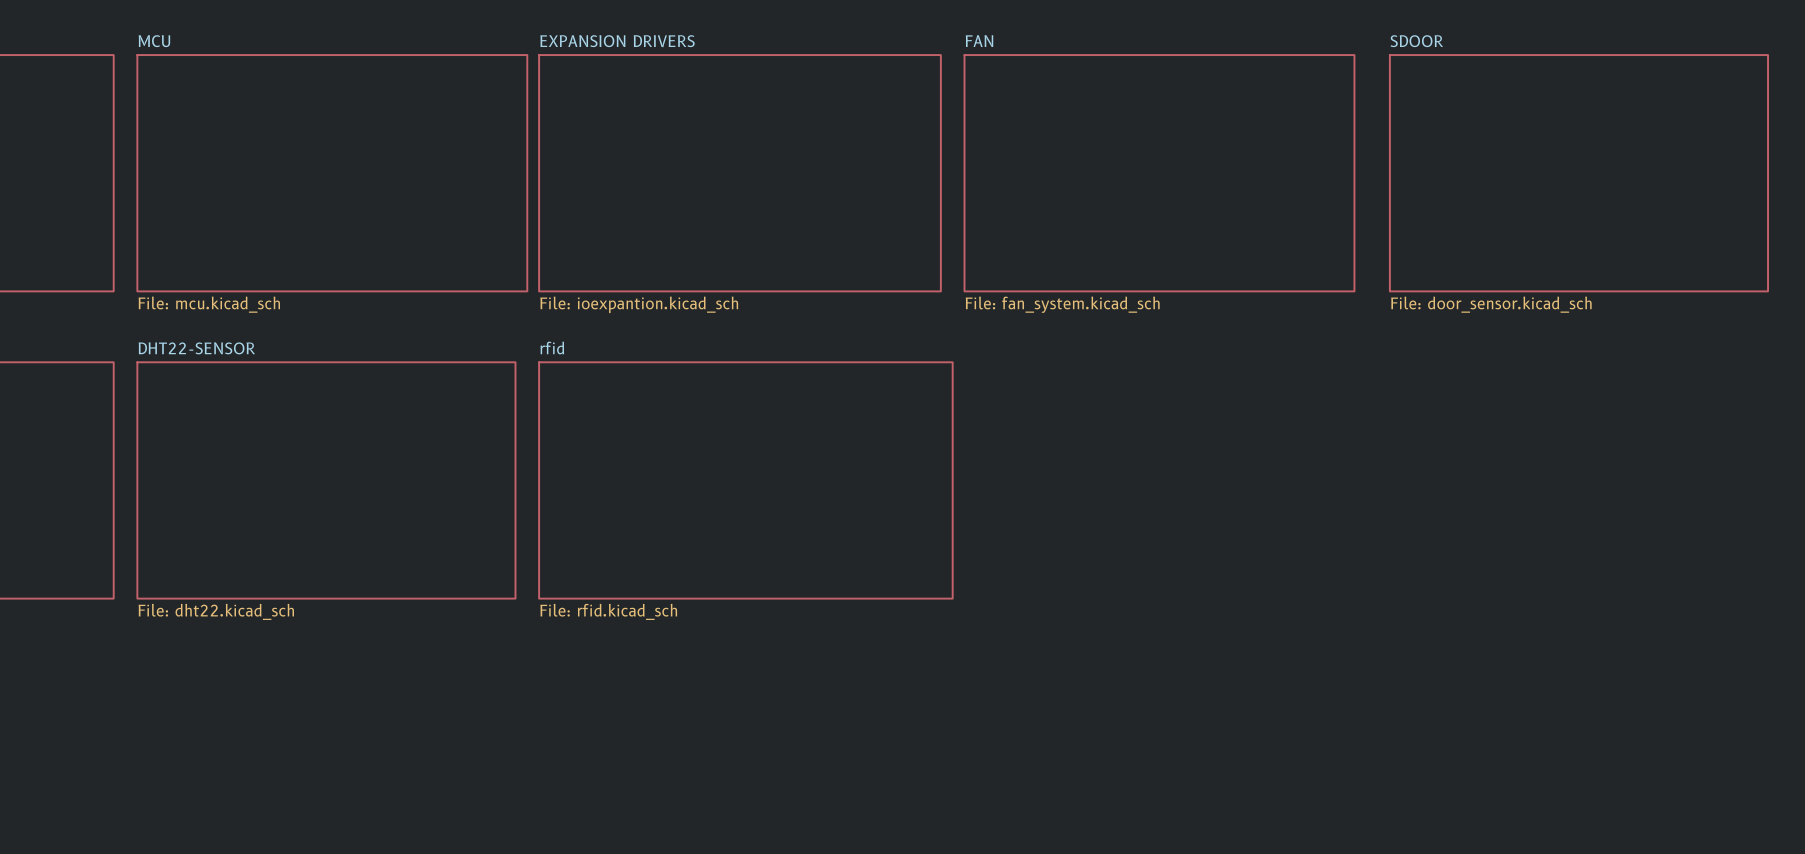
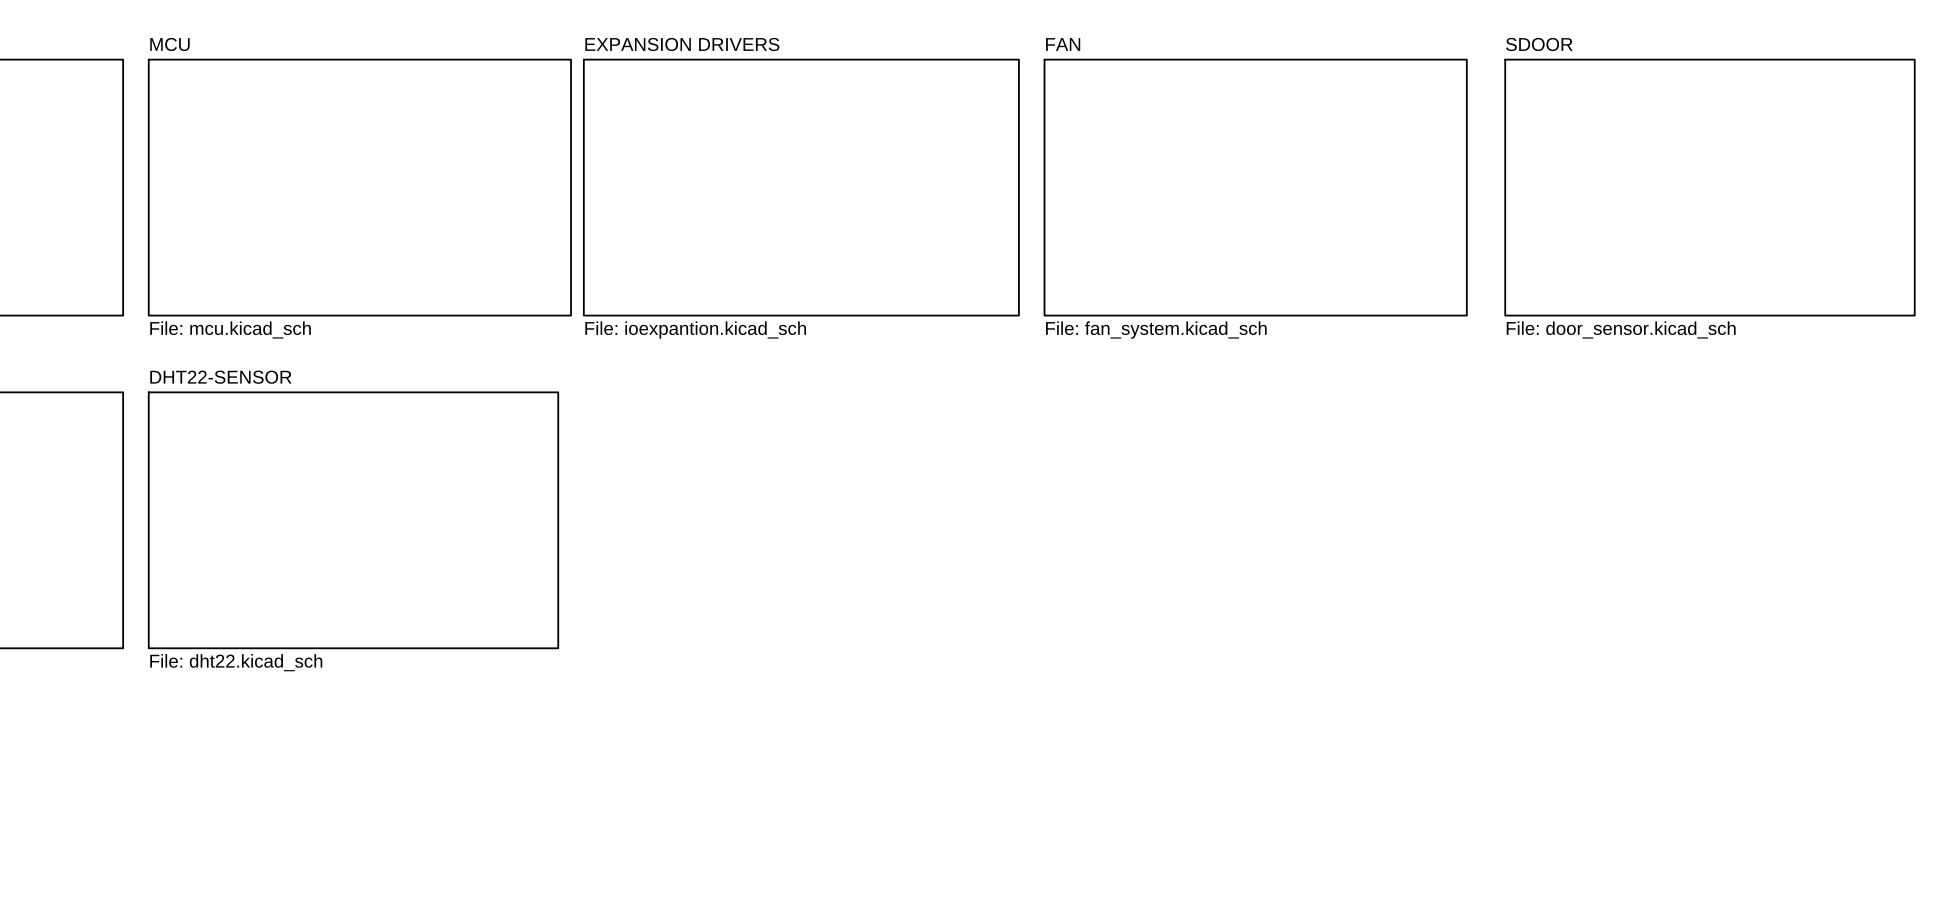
sheet rfid: File: rfid.kicad_sch (745, 480) -> none

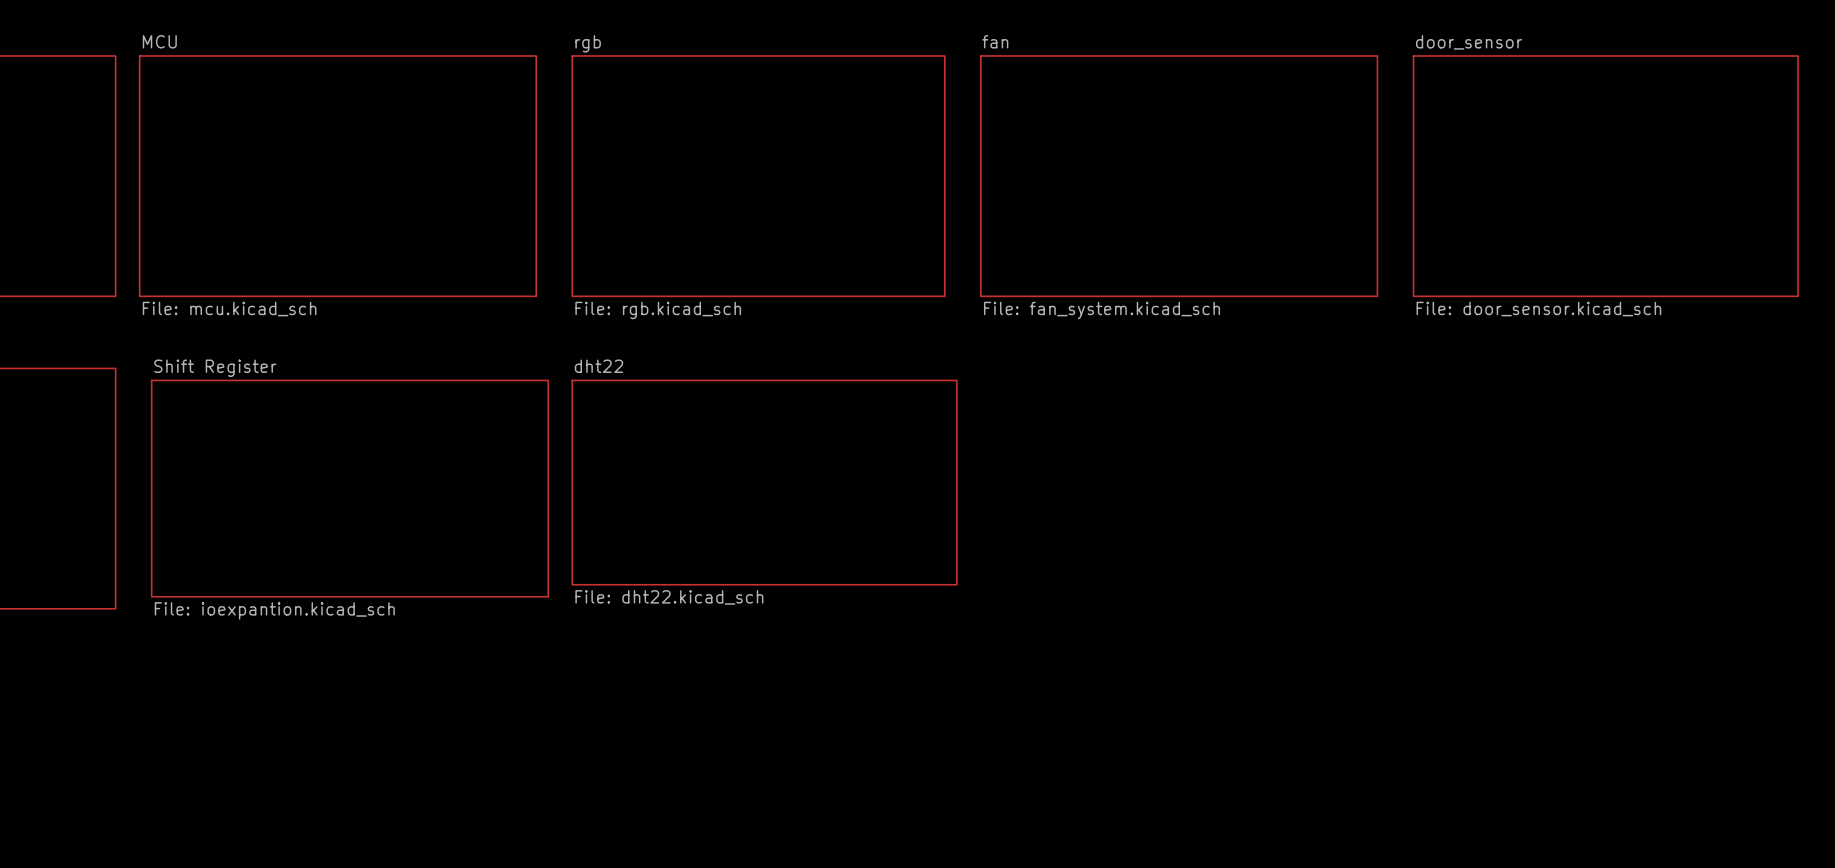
sheet FAN name: FAN (1063, 44) -> fan (995, 41)
sheet SDOOR name: SDOOR (1539, 44) -> door_sensor (1469, 42)
sheet EXPANSION DRIVERS: File: ioexpantion.kicad_sch (801, 187) -> none
sheet rgb: none -> File: rgb.kicad_sch (758, 176)
sheet dht22: none -> File: dht22.kicad_sch (764, 482)
sheet DHT22-SENSOR: File: dht22.kicad_sch (353, 520) -> none
sheet Shift Register: none -> File: ioexpantion.kicad_sch (349, 488)

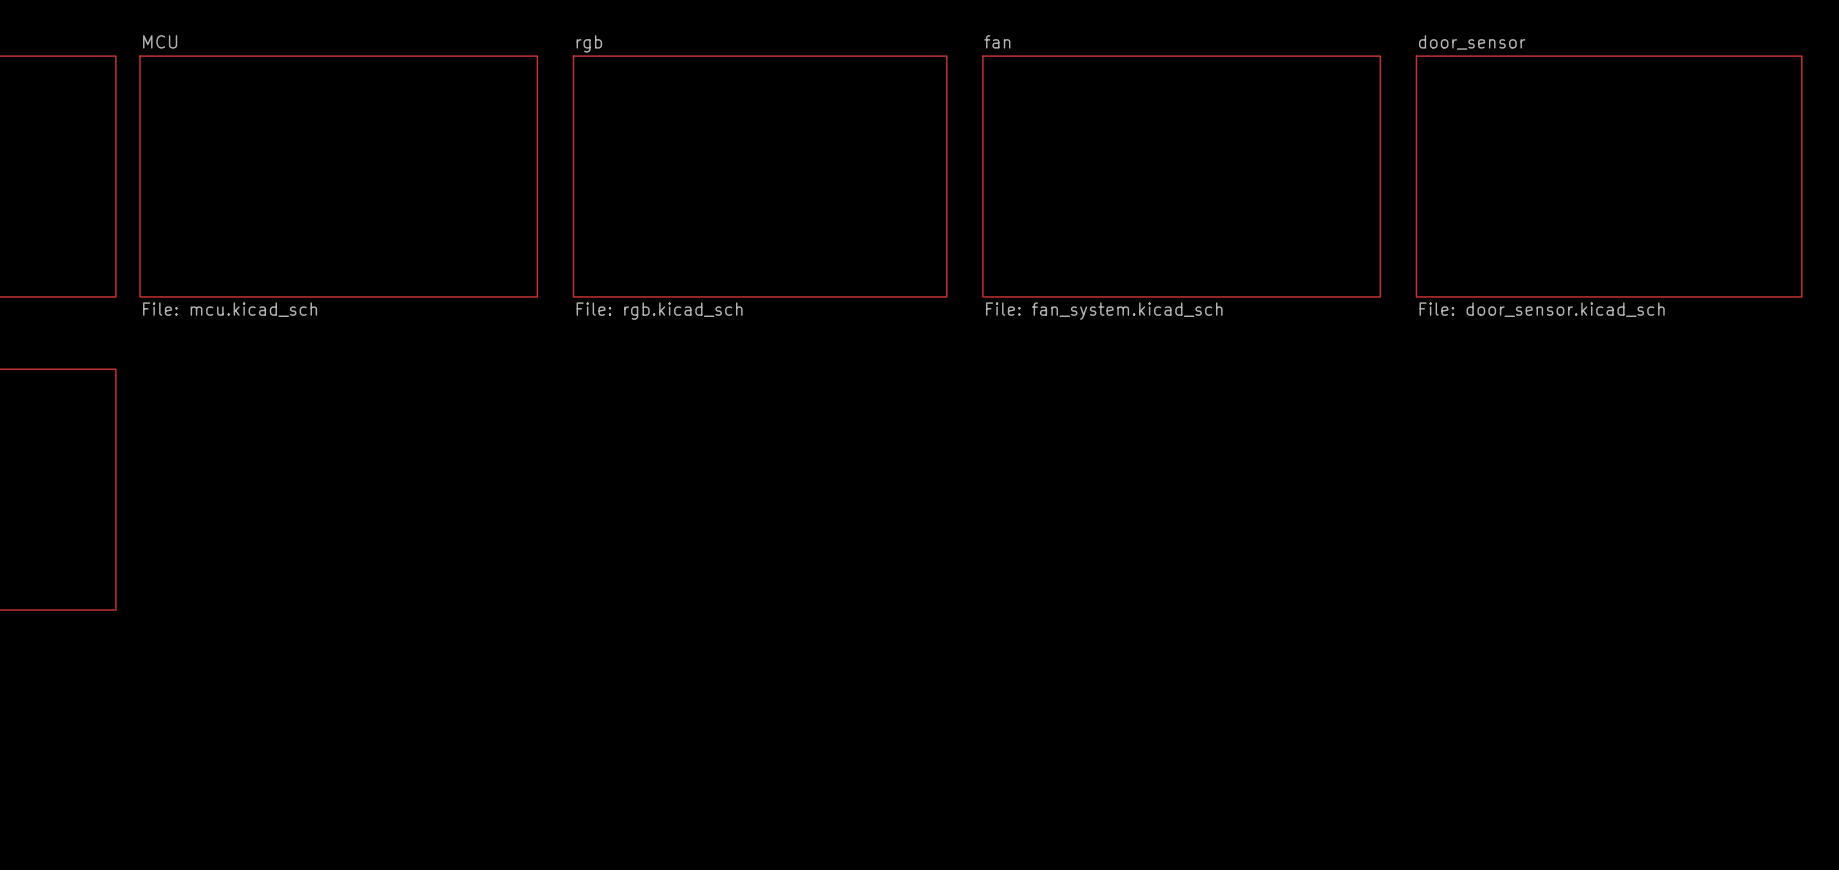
sheet dht22: File: dht22.kicad_sch (764, 482) -> none
sheet Shift Register: File: ioexpantion.kicad_sch (349, 488) -> none

